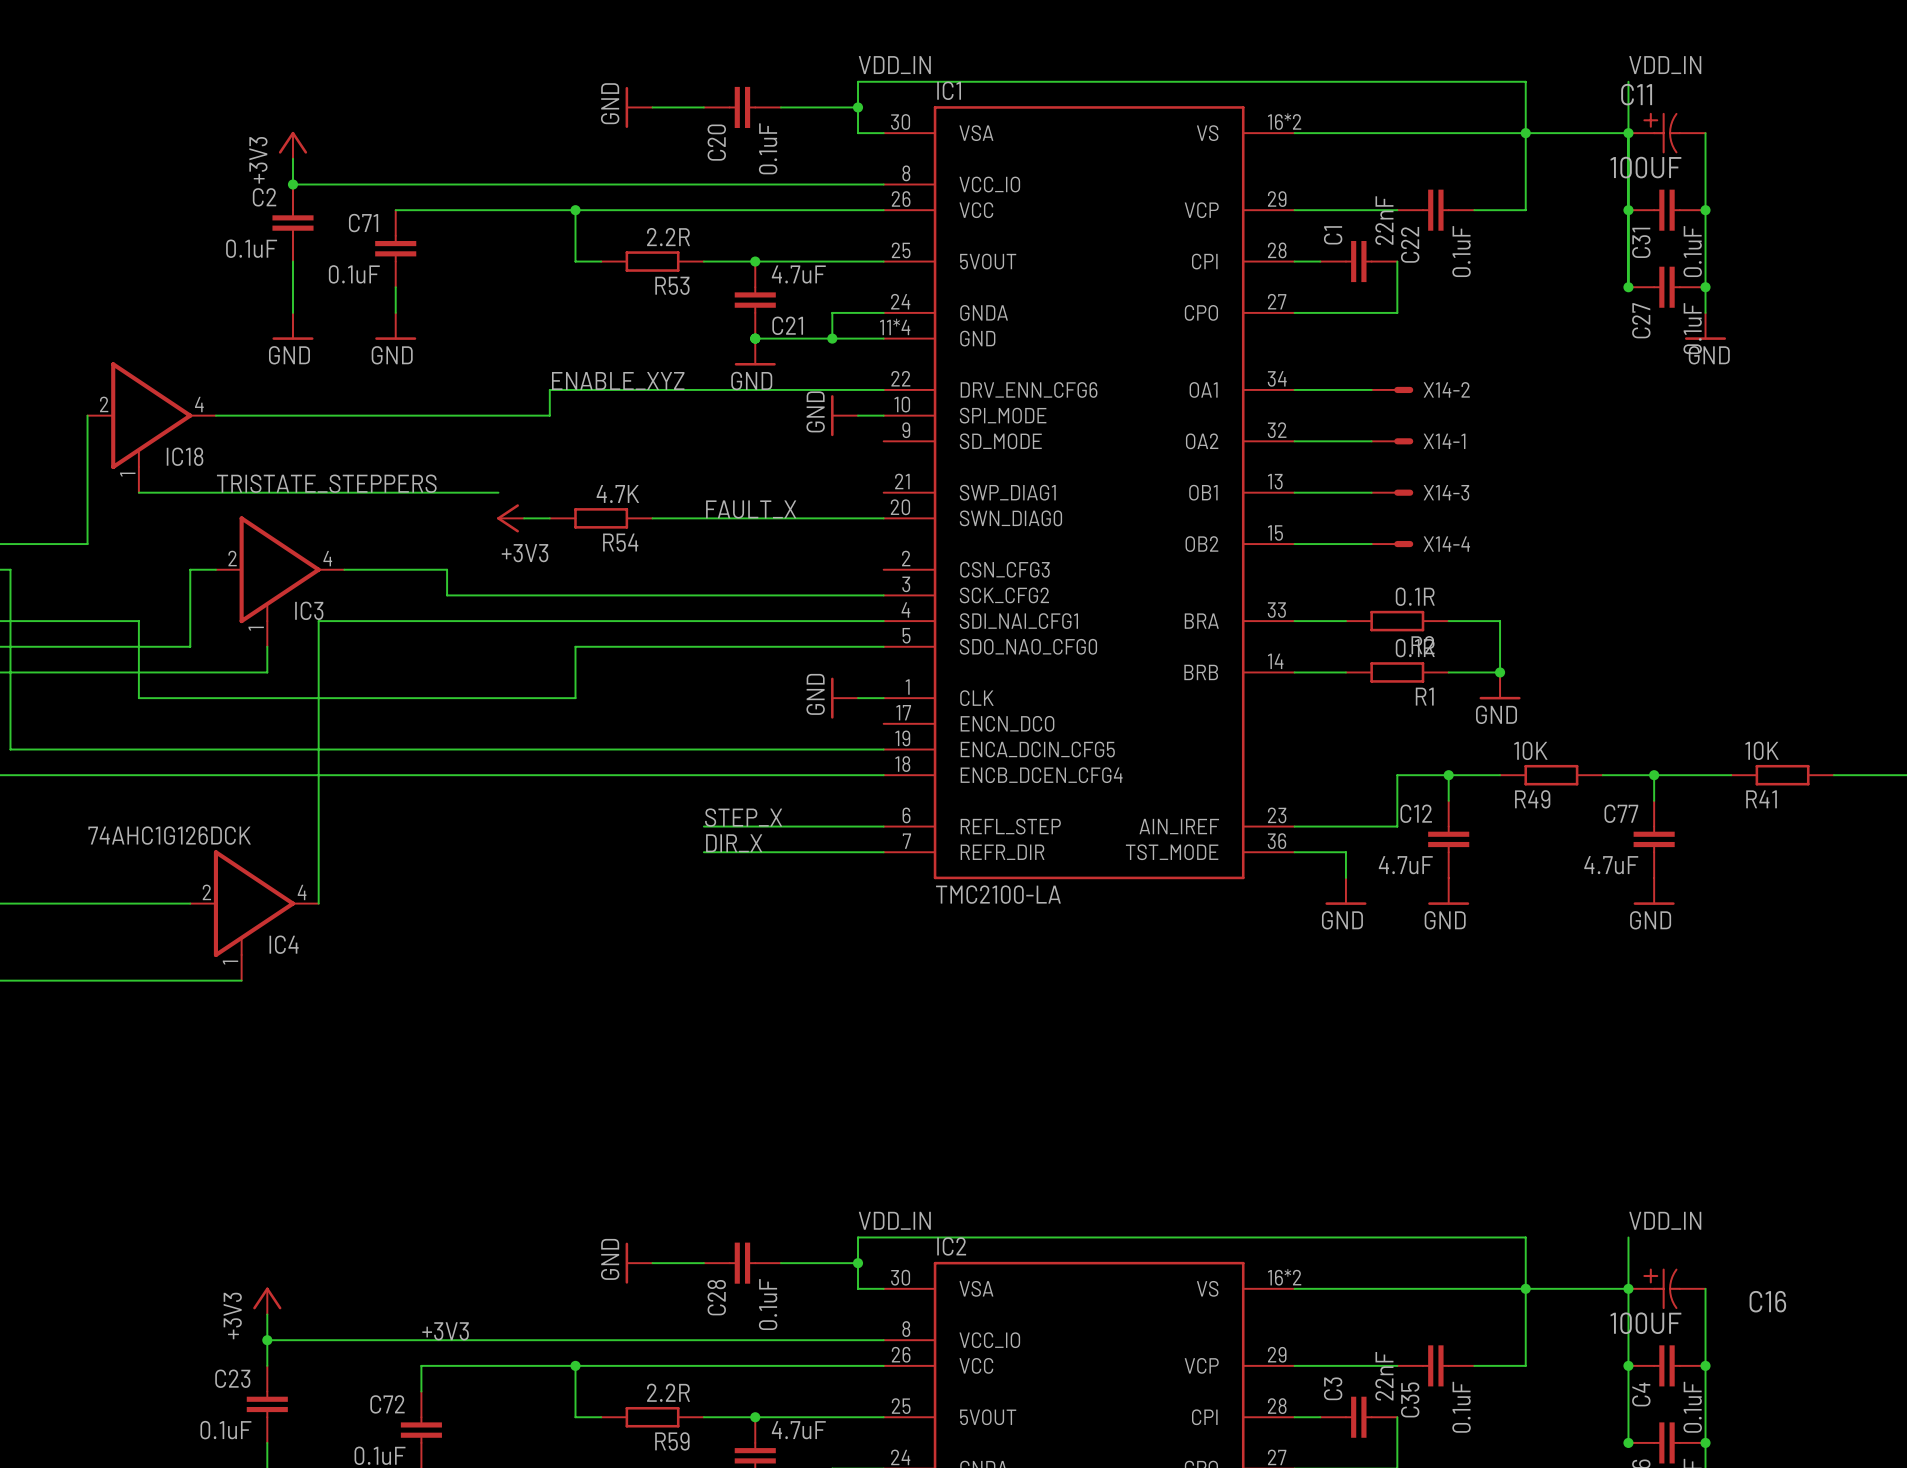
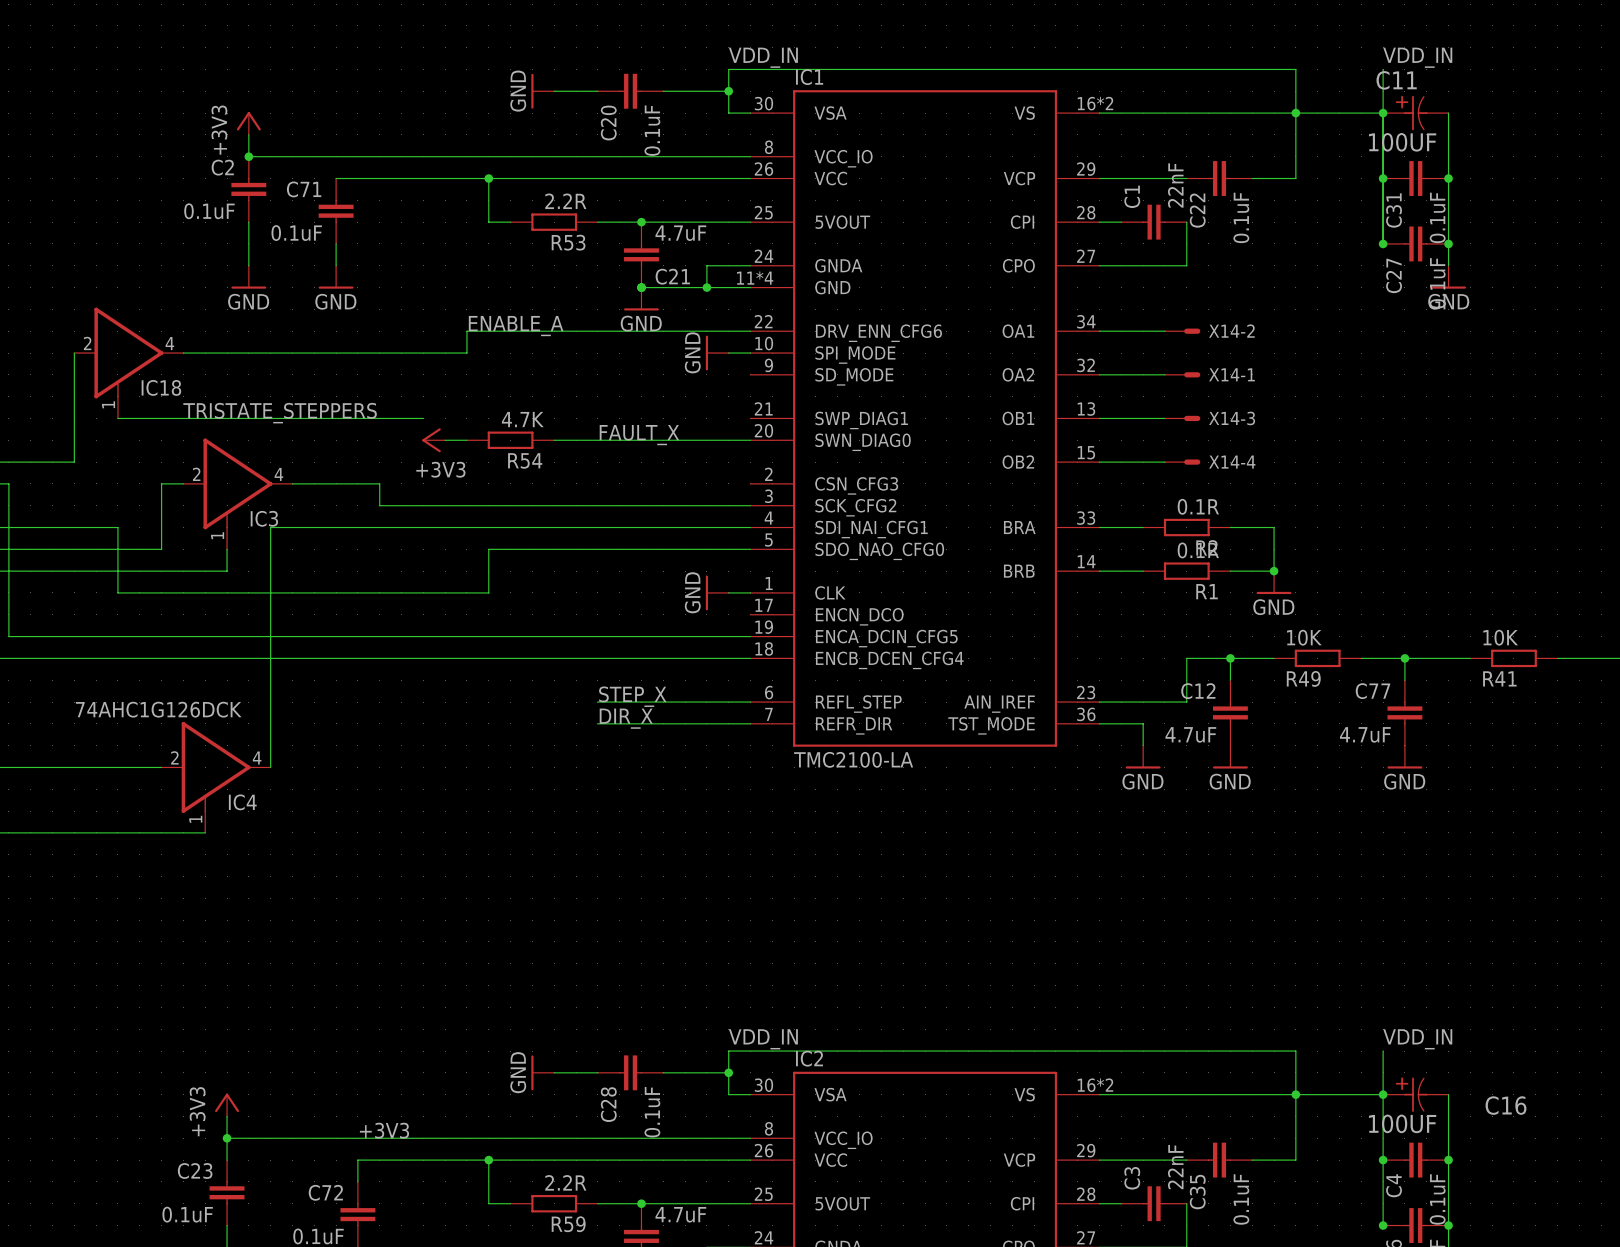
label: ENABLE_XYZ (618, 380) -> ENABLE_A (516, 326)

